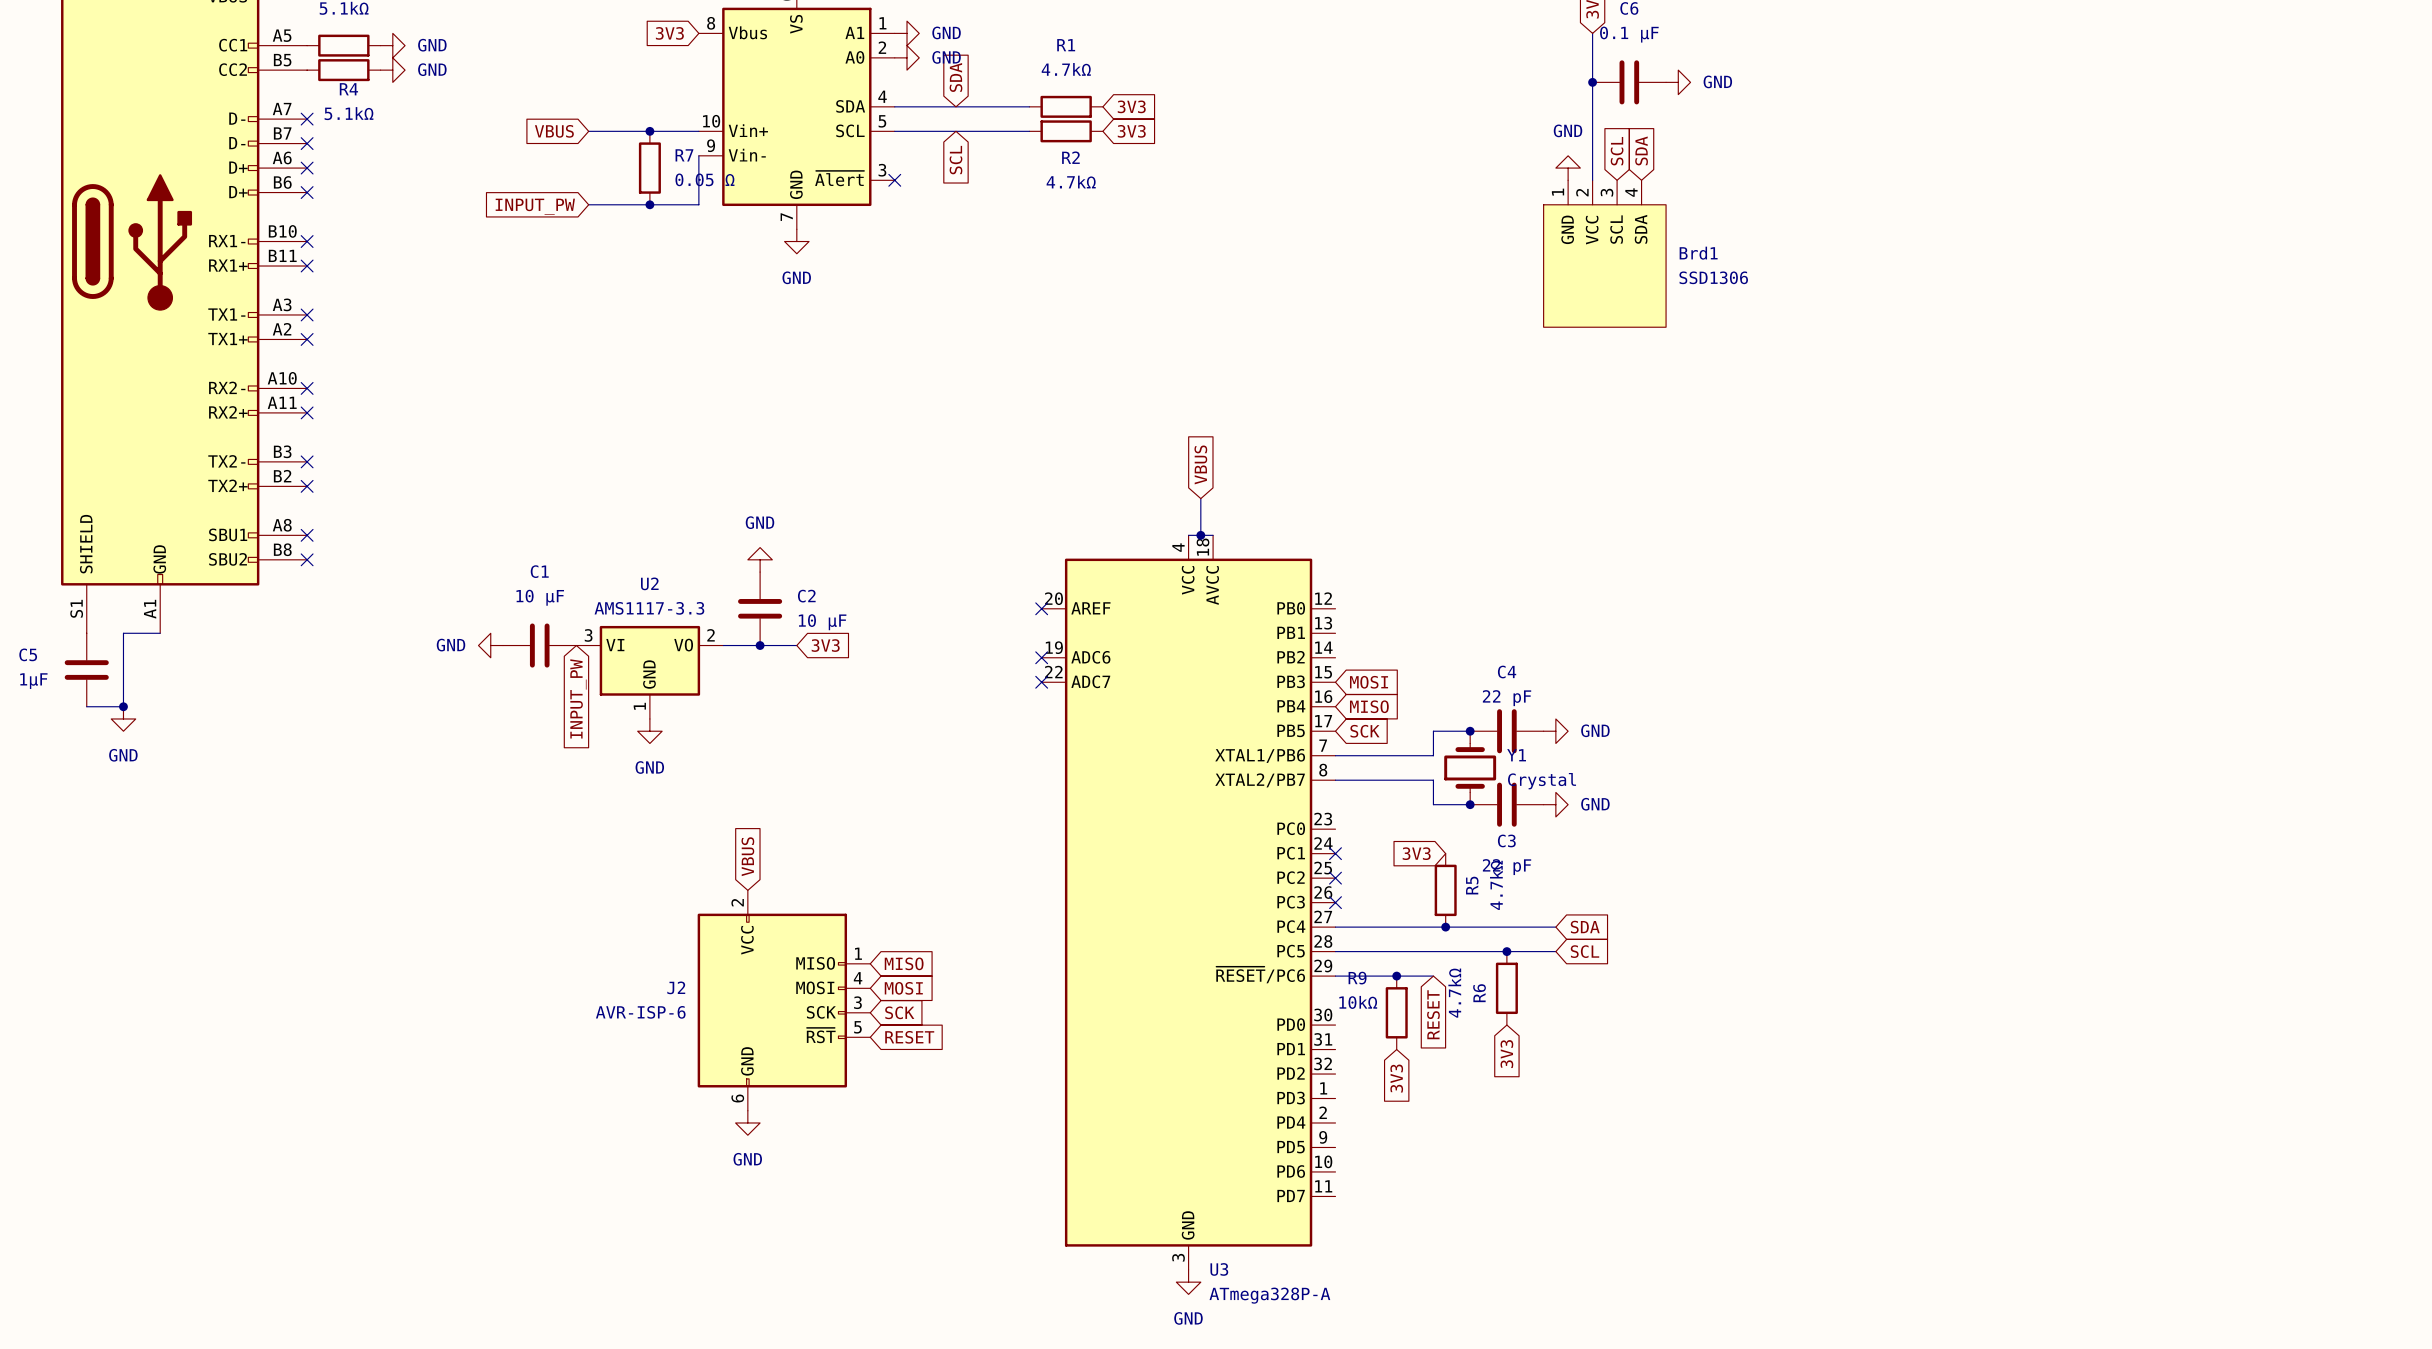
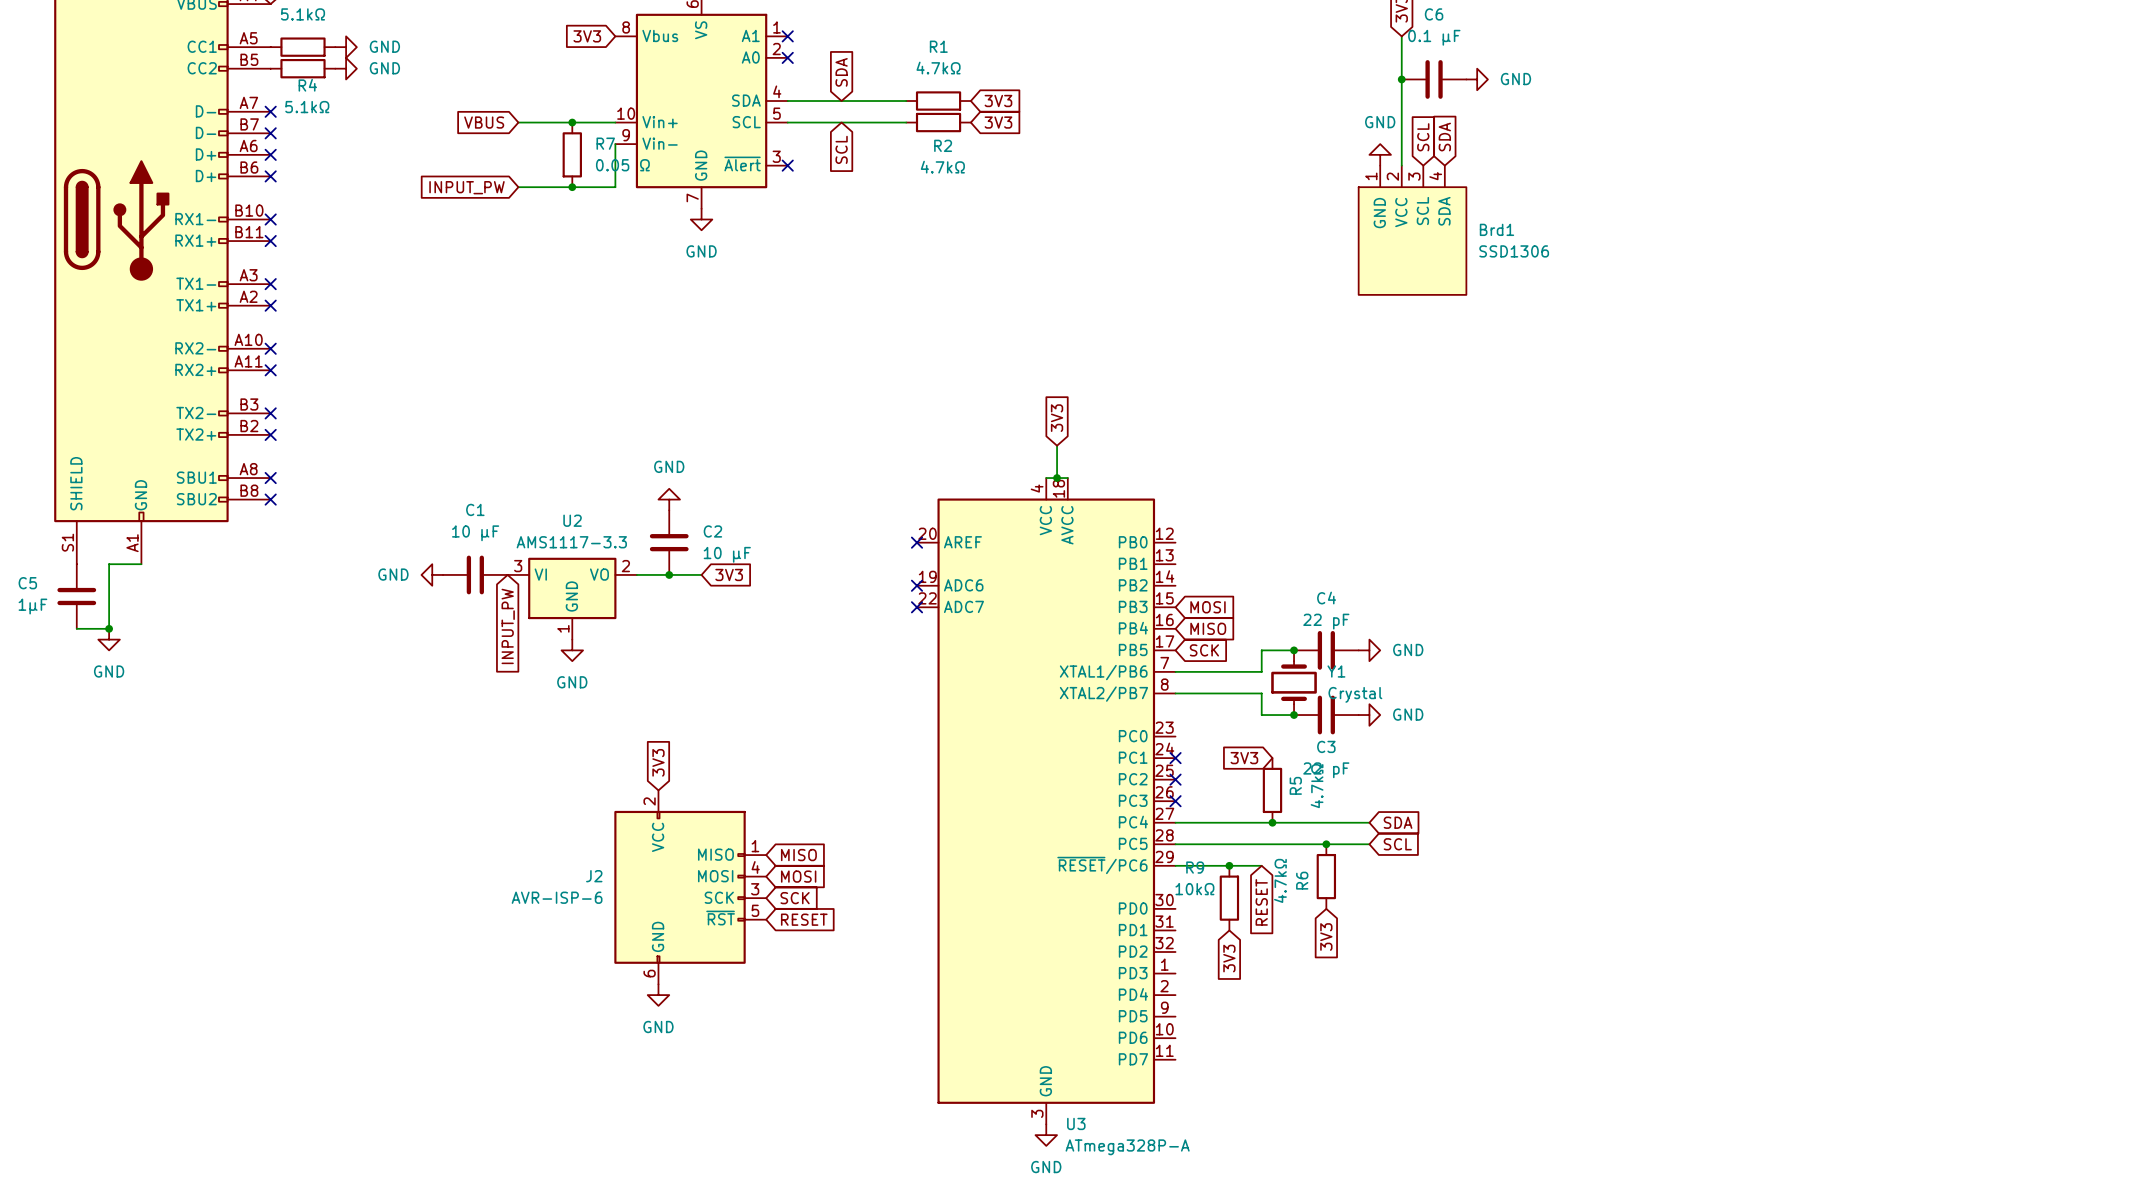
no-connect mark: none -> (787, 36)
power symbol: GND (907, 33) -> none
no-connect mark: none -> (787, 57)
power symbol: GND (907, 57) -> none
global label: VBUS (1200, 464) -> 3V3 (1057, 418)
global label: VBUS (747, 856) -> 3V3 (658, 762)

